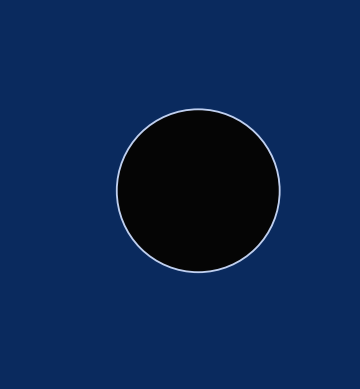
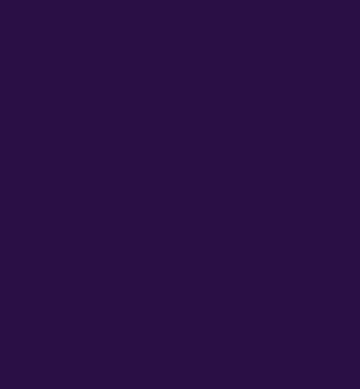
part: (198, 190) -> none

